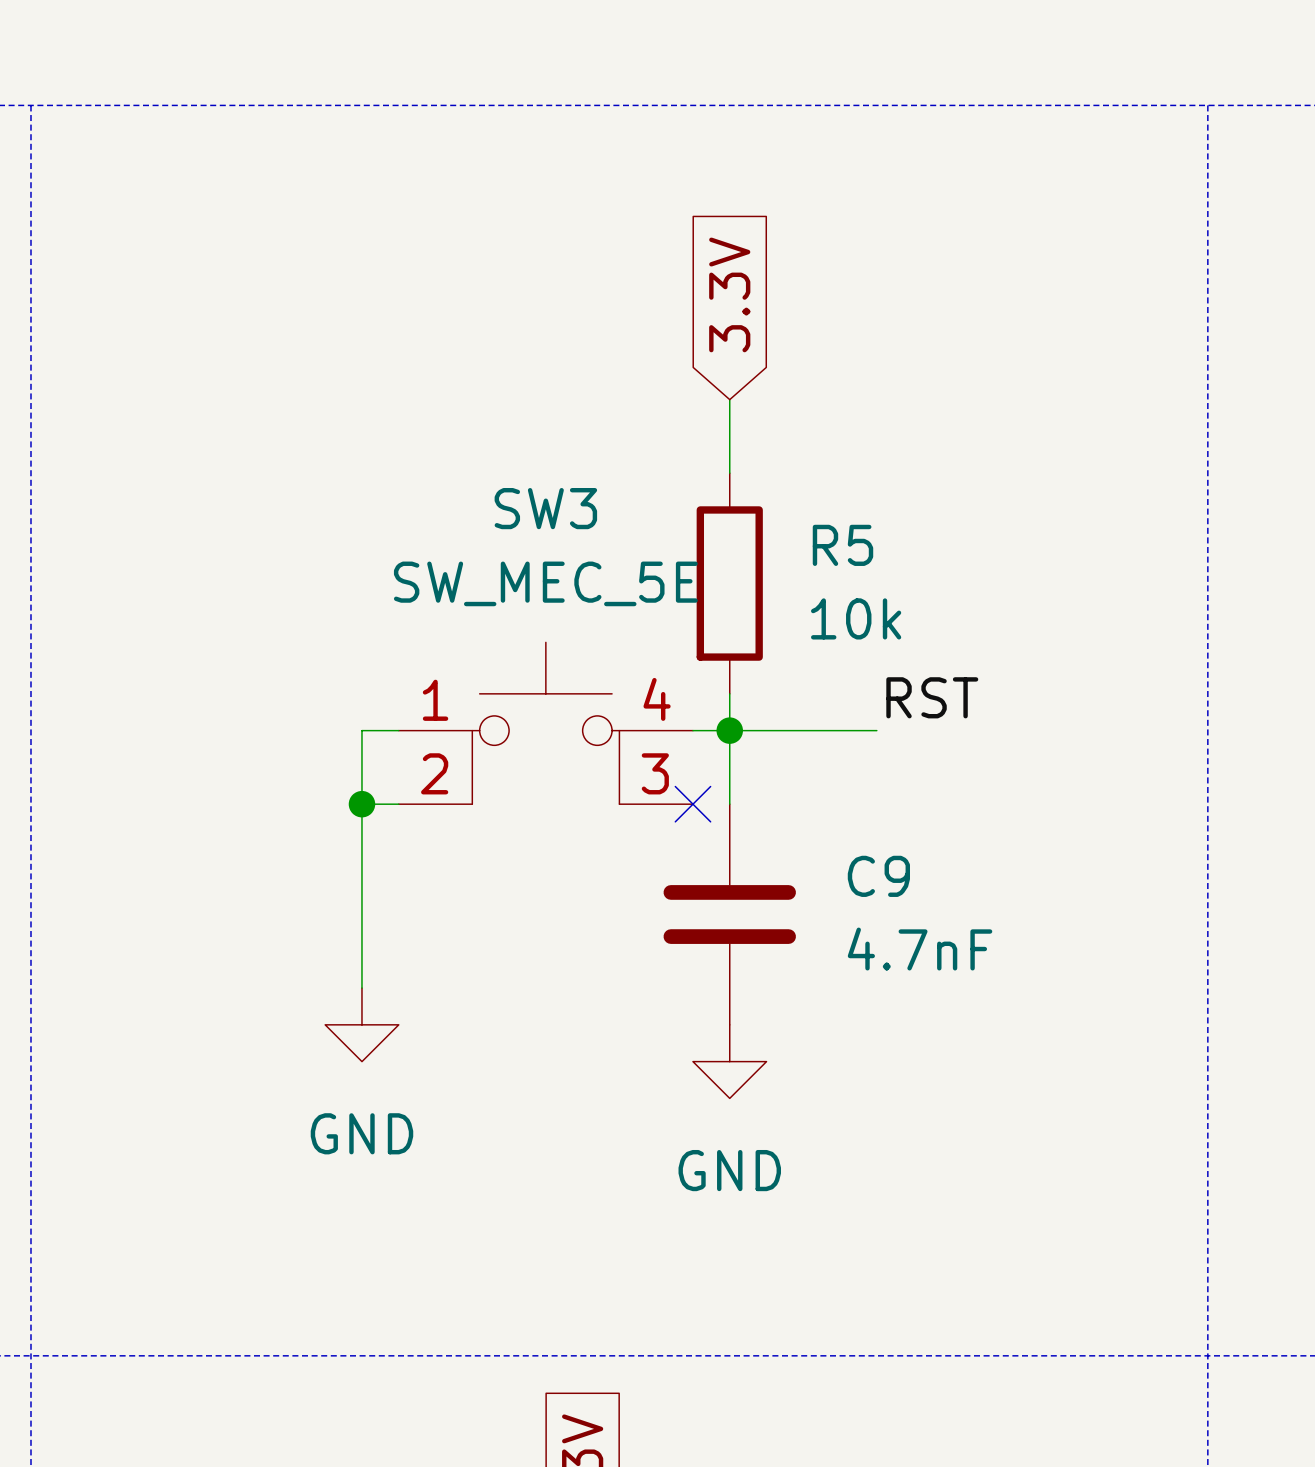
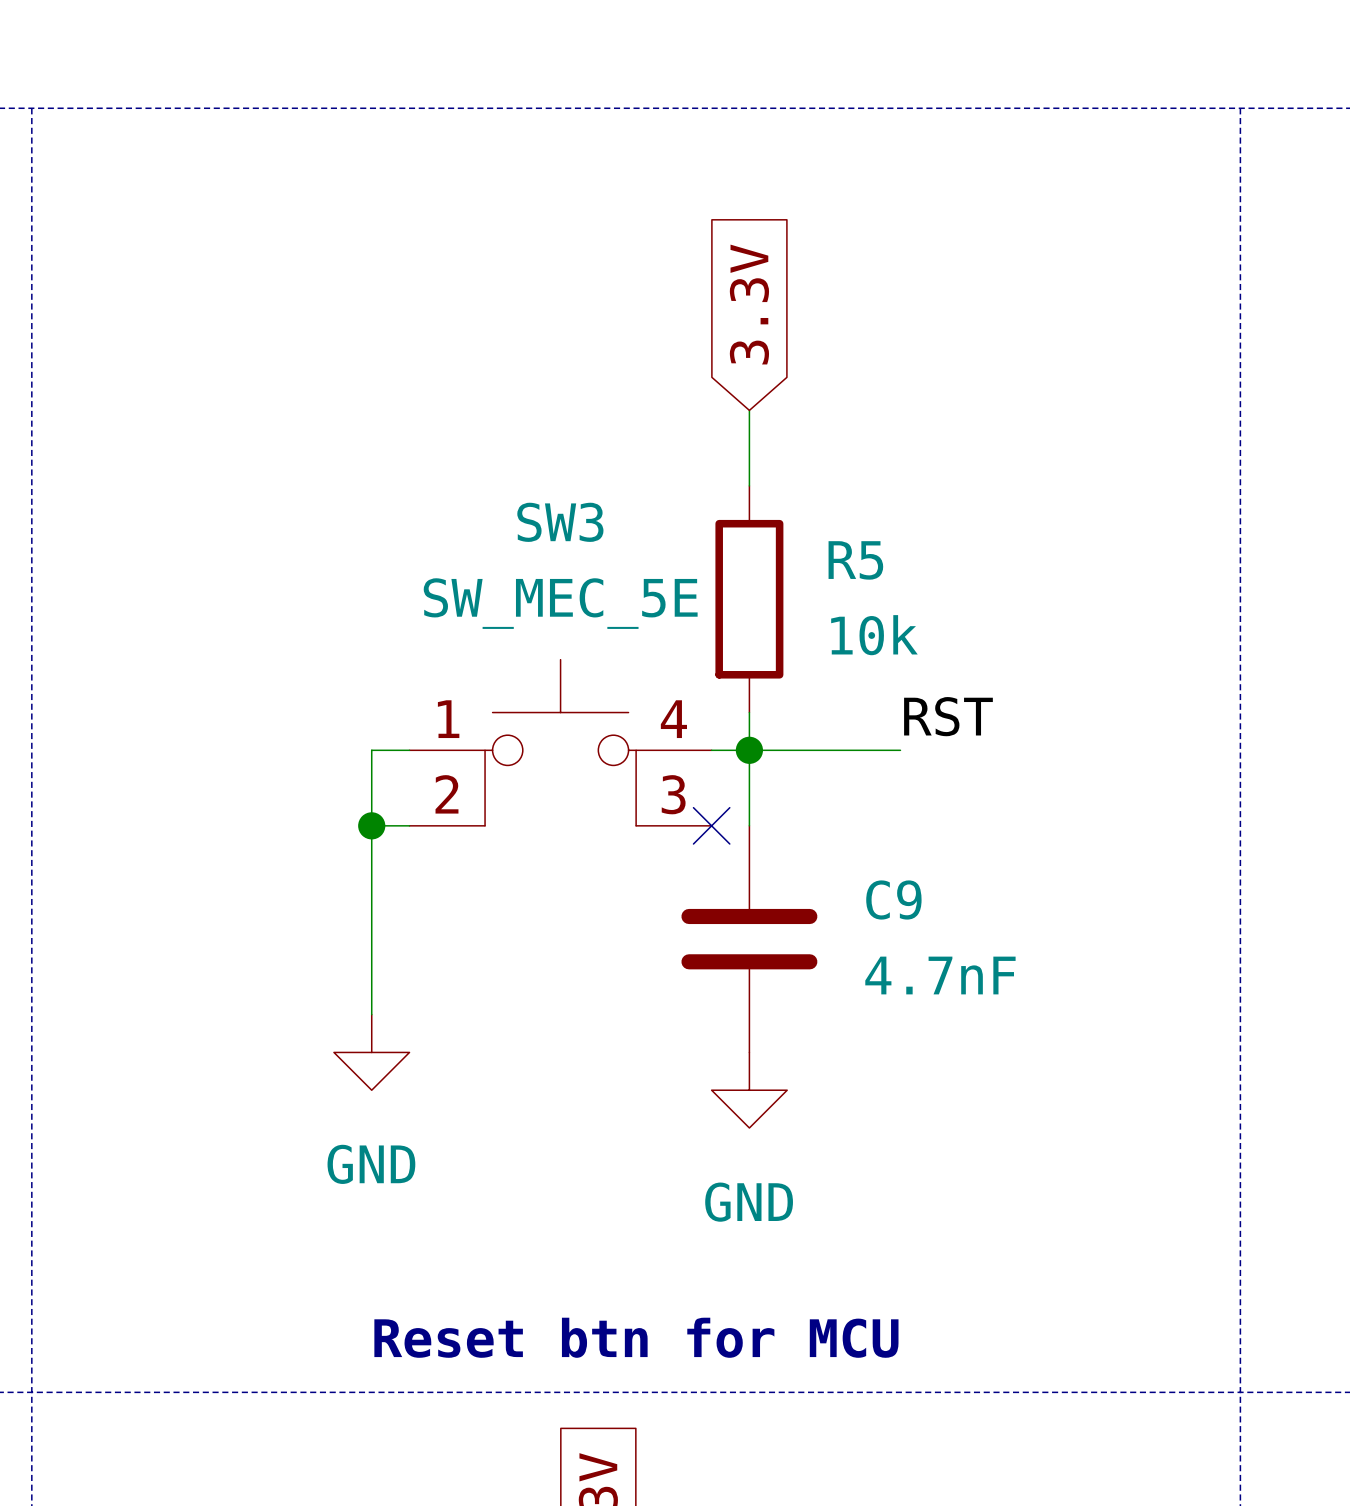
text: none -> Reset btn for MCU (636, 1337)

